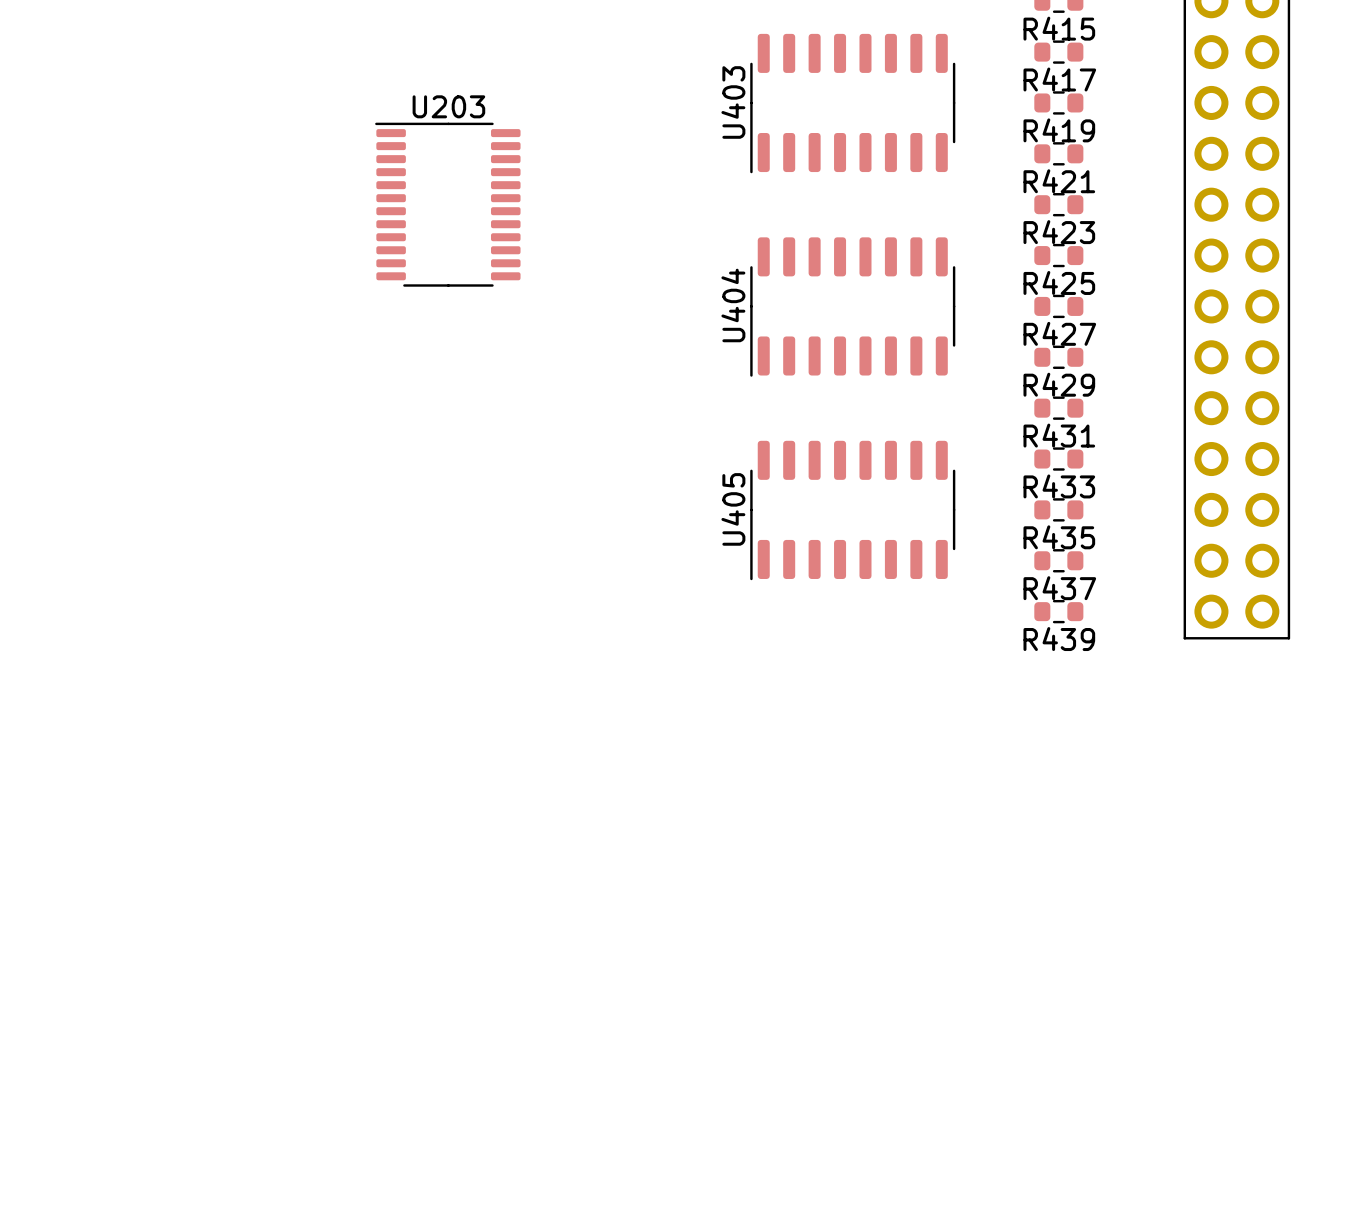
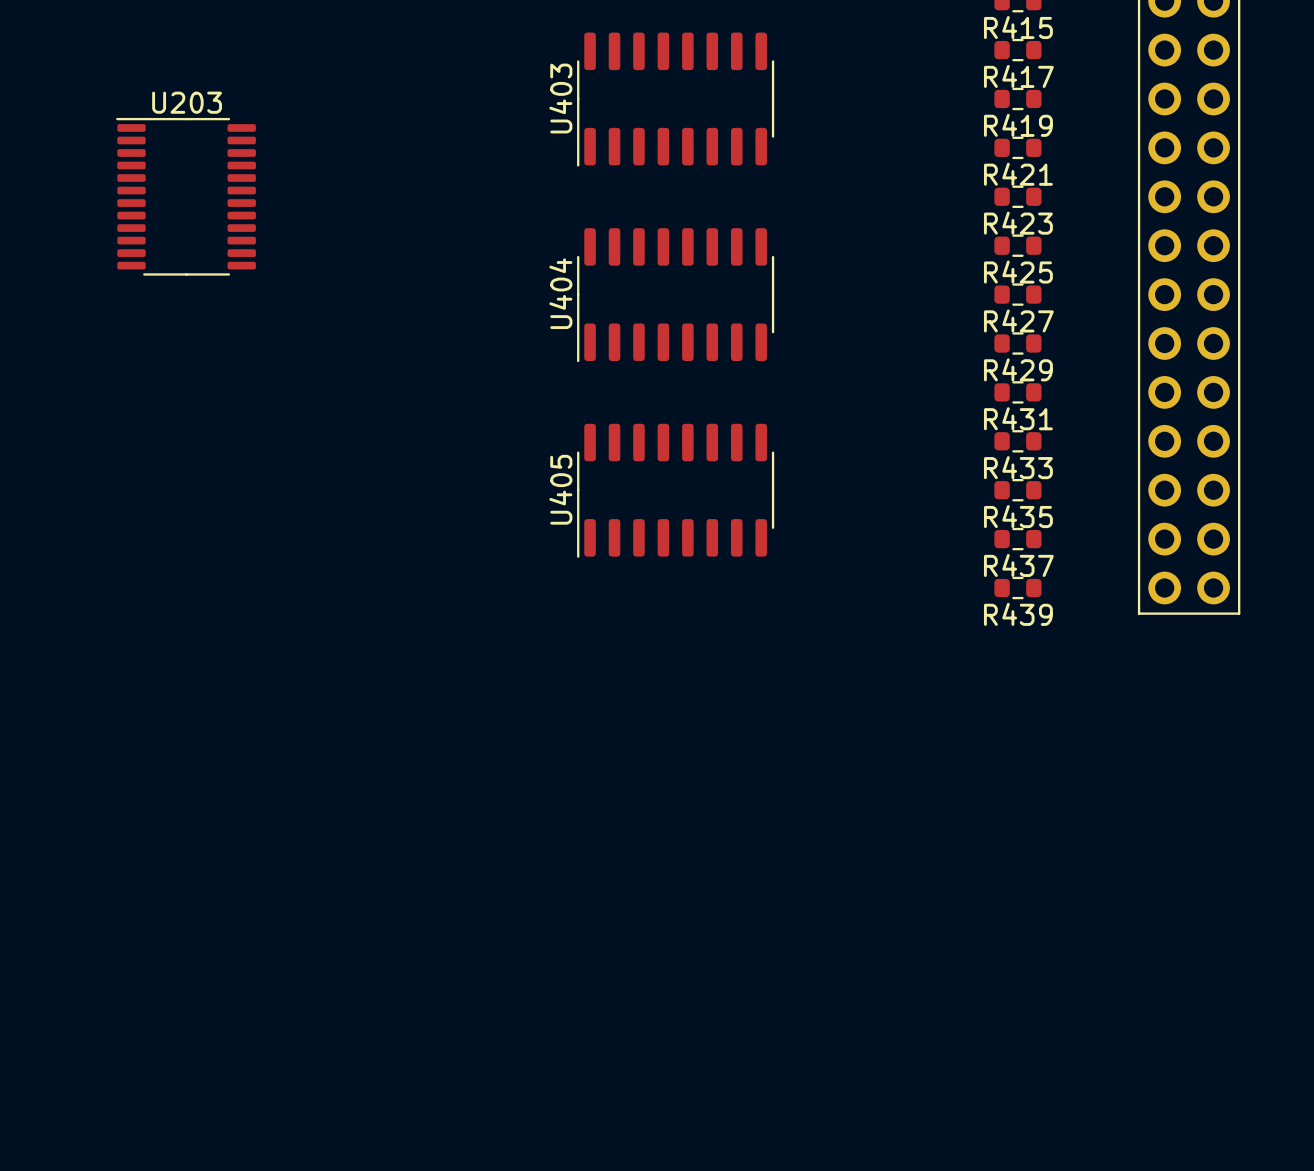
U403 position: (852, 103) -> (675, 99)
U203 position: (447, 204) -> (186, 196)
U404 position: (852, 307) -> (675, 295)
U405 position: (852, 510) -> (675, 490)

